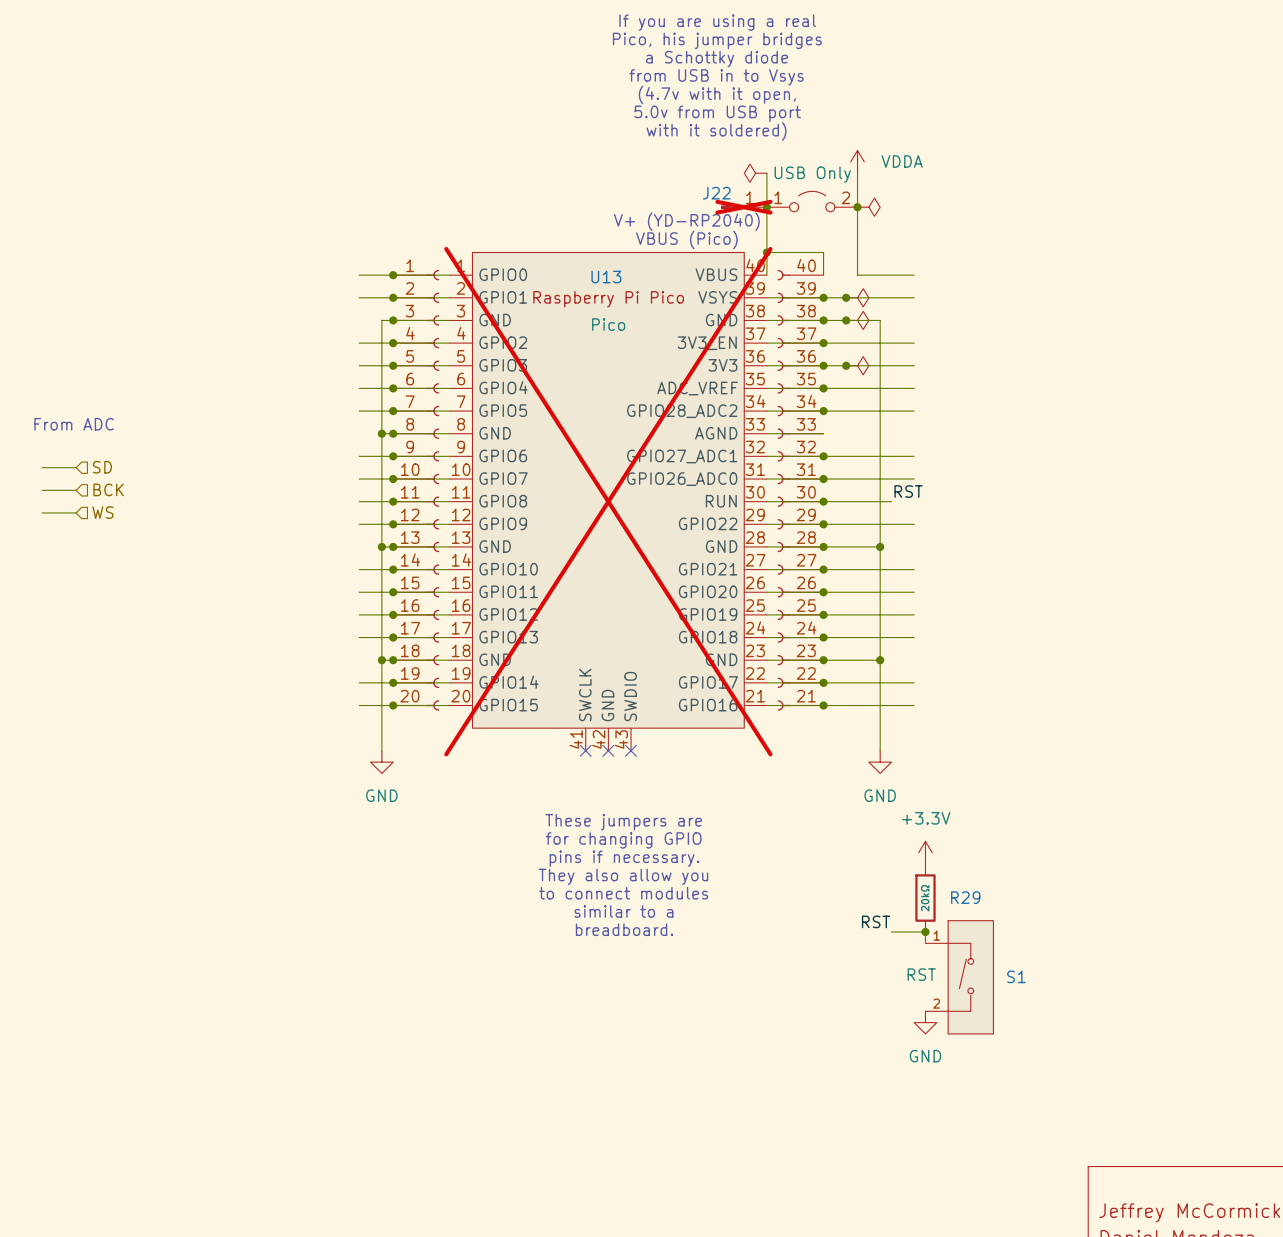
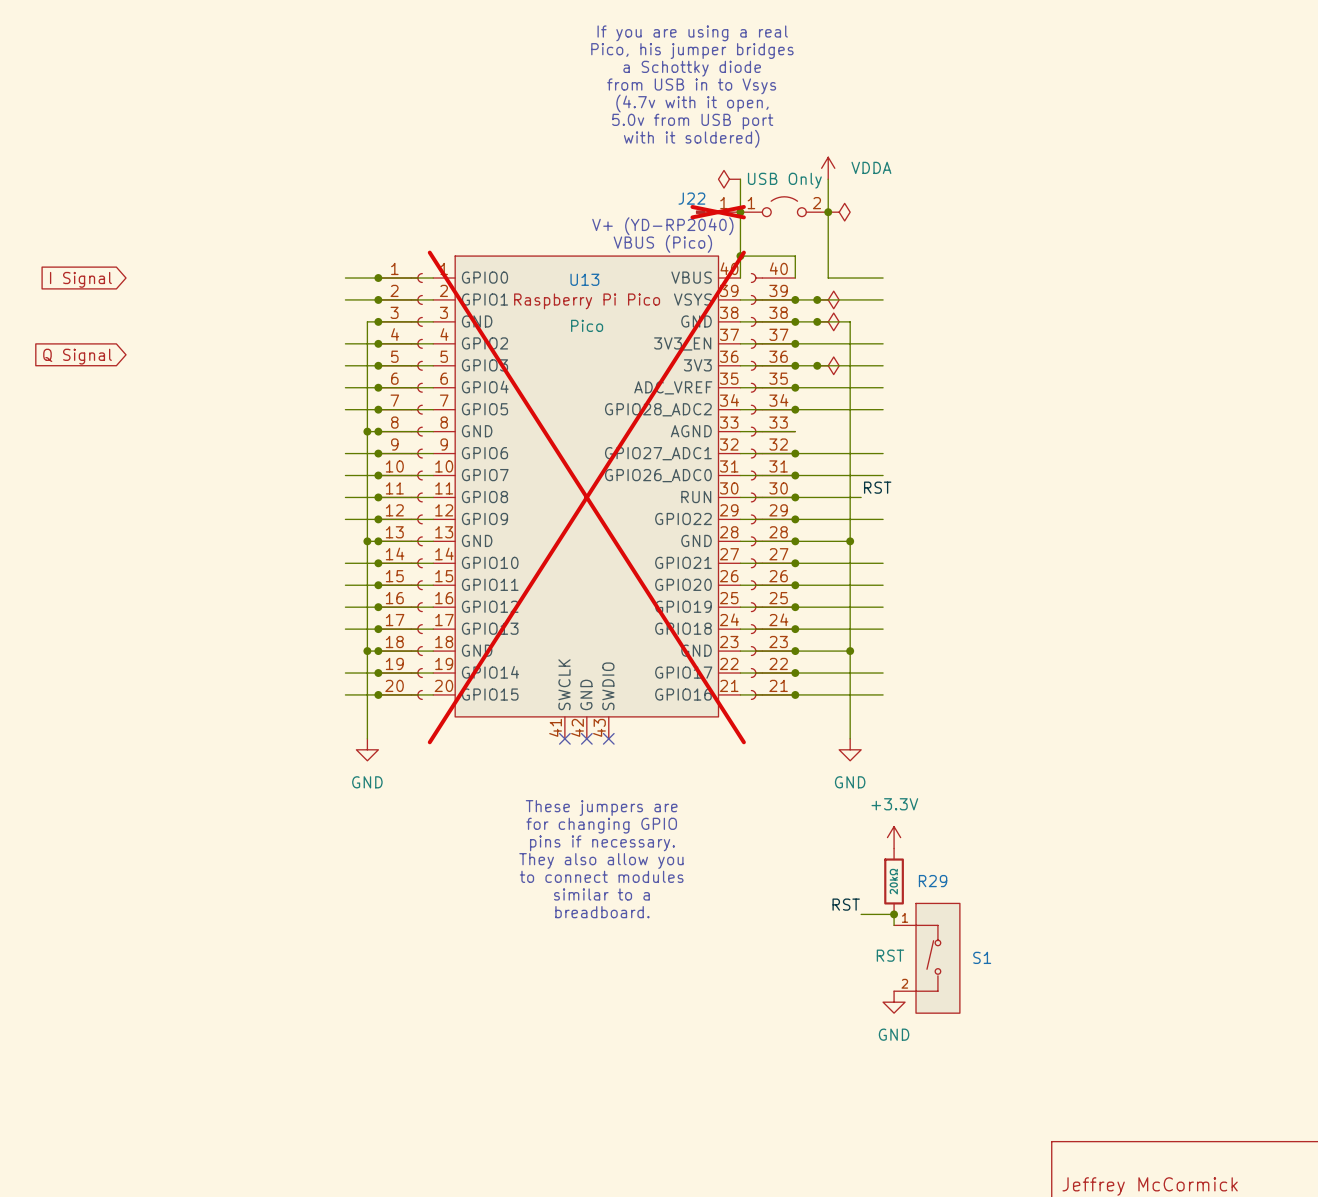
global label: none -> I Signal (80, 279)
global label: none -> Q Signal (77, 356)
text: From ADC (74, 424) -> none
wire: (42, 467) (76, 467) -> none
hierarchical label: SD (102, 467) -> none
hierarchical label: BCK (108, 489) -> none
wire: (42, 490) (76, 490) -> none
wire: (42, 512) (76, 512) -> none
hierarchical label: WS (102, 512) -> none

